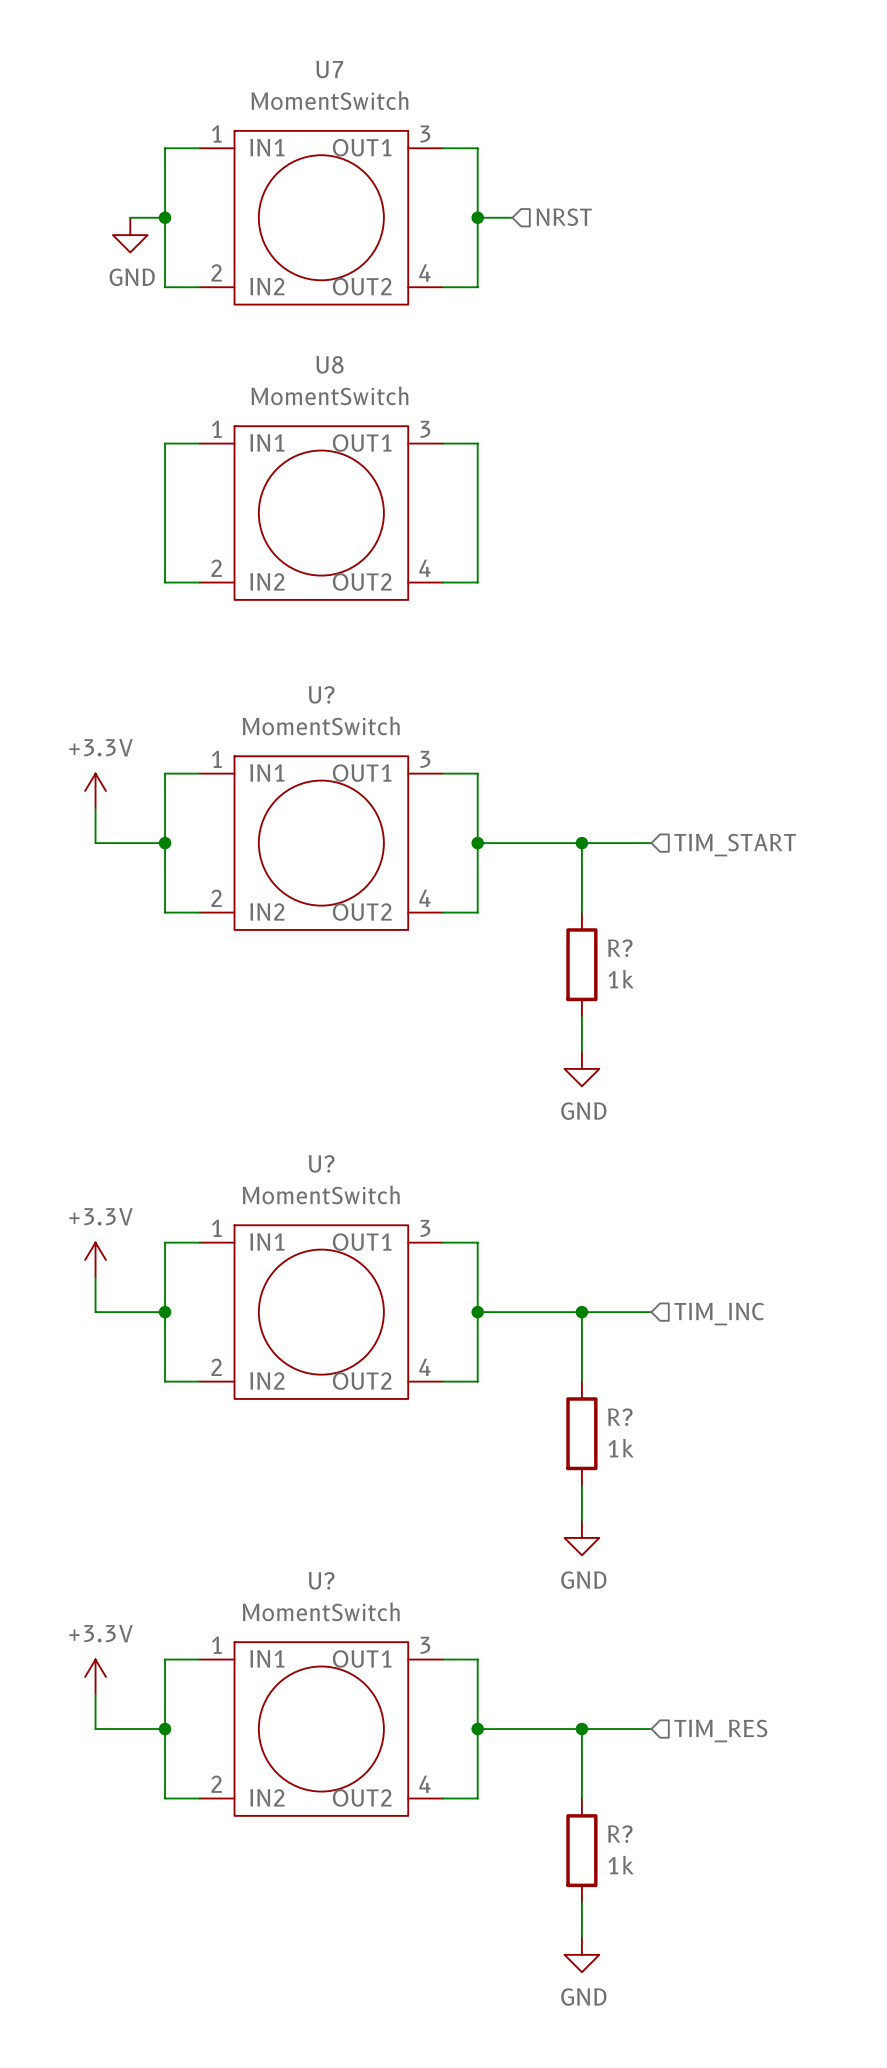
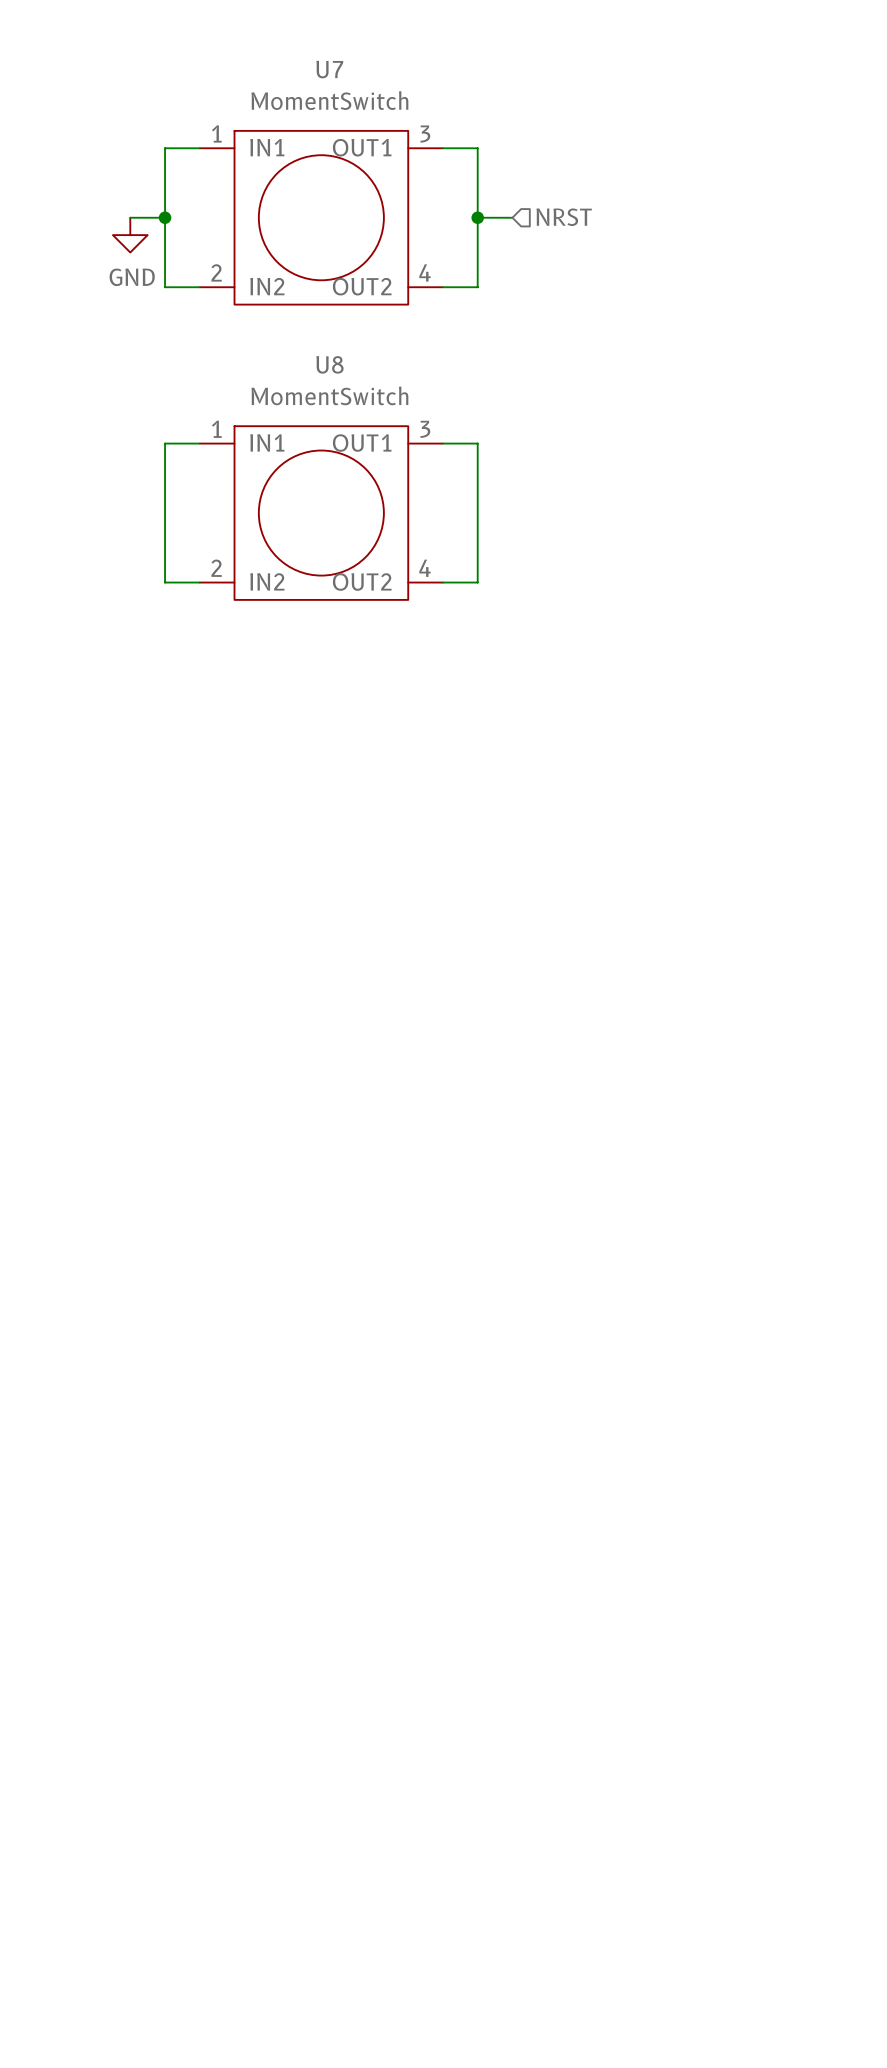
wire: (199, 773) (165, 773) (165, 912) (199, 912) -> none
wire: (442, 773) (477, 773) (477, 912) (442, 912) -> none
power symbol: +3.3V (95, 790) -> none
wire: (95, 808) (95, 843) (165, 843) -> none
junction: (165, 843) -> none
U?: MomentSwitch (321, 843) -> none
wire: (477, 843) (651, 843) -> none
junction: (477, 843) -> none
wire: (581, 843) (581, 912) -> none
junction: (581, 843) -> none
hierarchical label: TIM_START (735, 845) -> none
R?: 1k (581, 964) -> none
wire: (581, 1016) (581, 1051) -> none
power symbol: GND (581, 1068) -> none
wire: (199, 1242) (165, 1242) (165, 1381) (199, 1381) -> none
wire: (442, 1242) (477, 1242) (477, 1381) (442, 1381) -> none
power symbol: +3.3V (95, 1260) -> none
wire: (95, 1277) (95, 1312) (165, 1312) -> none
junction: (165, 1312) -> none
U?: MomentSwitch (321, 1312) -> none
wire: (477, 1312) (651, 1312) -> none
junction: (477, 1312) -> none
wire: (581, 1312) (581, 1381) -> none
junction: (581, 1312) -> none
hierarchical label: TIM_INC (719, 1314) -> none
R?: 1k (581, 1433) -> none
wire: (581, 1485) (581, 1520) -> none
power symbol: GND (581, 1537) -> none
wire: (199, 1659) (165, 1659) (165, 1798) (199, 1798) -> none
wire: (442, 1659) (477, 1659) (477, 1798) (442, 1798) -> none
power symbol: +3.3V (95, 1676) -> none
wire: (95, 1694) (95, 1729) (165, 1729) -> none
junction: (165, 1729) -> none
U?: MomentSwitch (321, 1729) -> none
wire: (477, 1729) (651, 1729) -> none
junction: (477, 1729) -> none
wire: (581, 1729) (581, 1798) -> none
junction: (581, 1729) -> none
hierarchical label: TIM_RES (720, 1730) -> none
R?: 1k (581, 1850) -> none
wire: (581, 1902) (581, 1937) -> none
power symbol: GND (581, 1954) -> none

